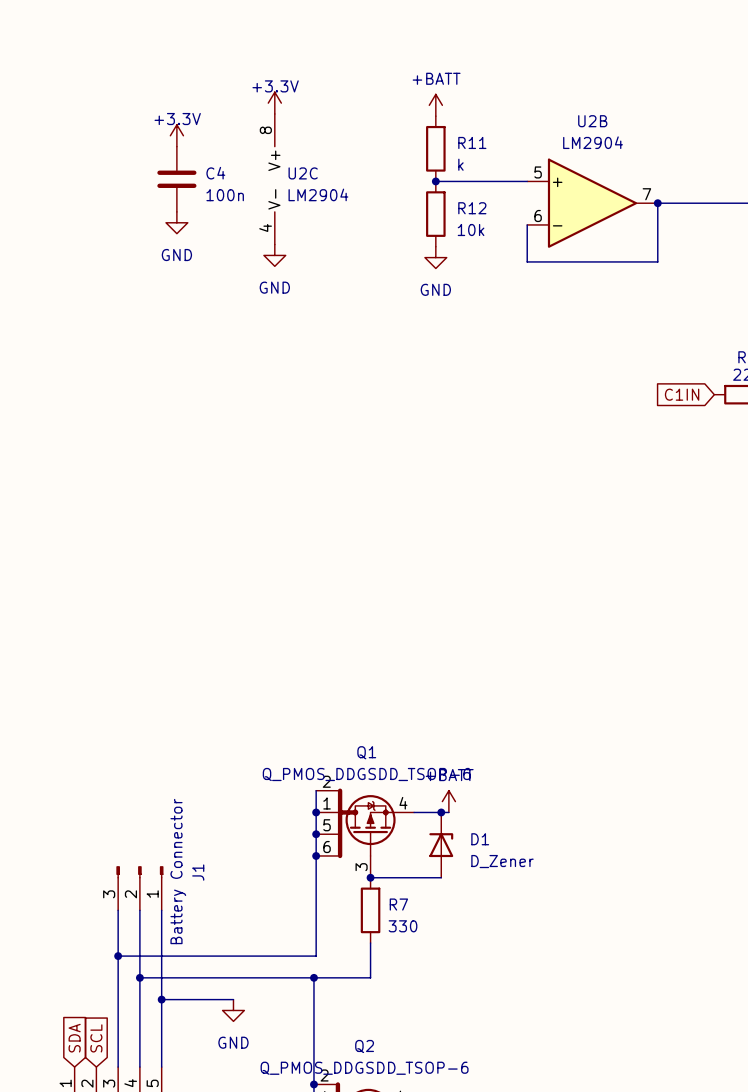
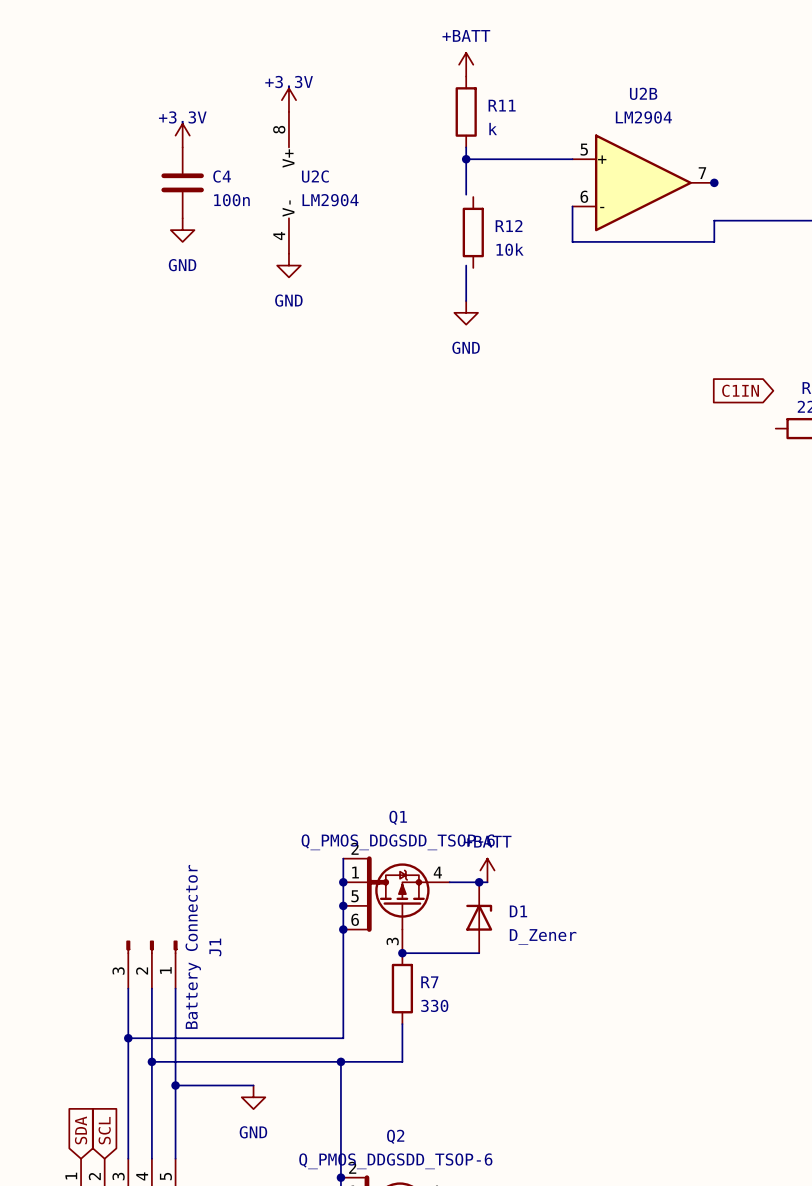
power symbol position: +3.3V (274, 103) -> +3.3V (288, 100)
power symbol position: +BATT (435, 105) -> +BATT (466, 64)
power symbol position: +3.3V (176, 135) -> +3.3V (182, 135)
wire: none -> (466, 147) (466, 194)
wire: none -> (466, 159) (572, 159)
R11 position: (435, 148) -> (466, 111)
C4 position: (176, 179) -> (182, 182)
U2C position: (274, 179) -> (288, 182)
wire: (435, 181) (527, 181) -> none
junction position: (435, 181) -> (466, 159)
U2B position: (592, 203) -> (643, 182)
junction position: (657, 203) -> (714, 182)
power symbol position: GND (176, 222) -> GND (182, 230)
wire: (657, 222) (657, 261) (527, 261) (527, 224) -> (714, 241) (572, 241) (572, 206)
wire: none -> (466, 265) (466, 301)
power symbol position: GND (274, 255) -> GND (288, 265)
power symbol position: GND (435, 257) -> GND (466, 312)
global label position: C1IN (682, 394) -> C1IN (740, 390)

